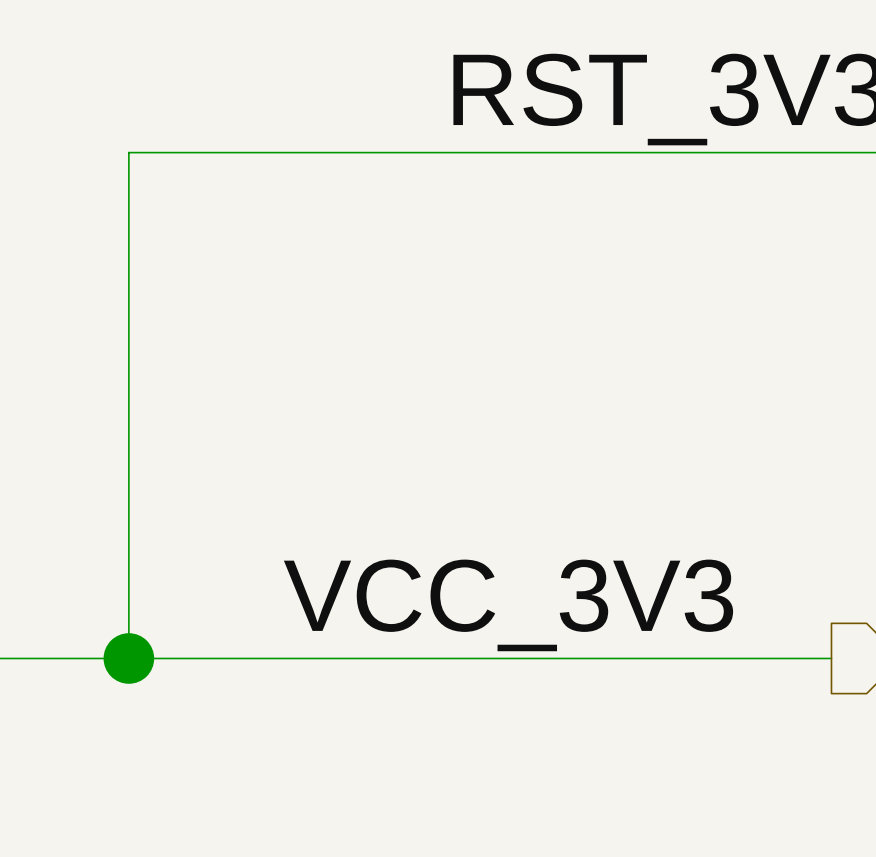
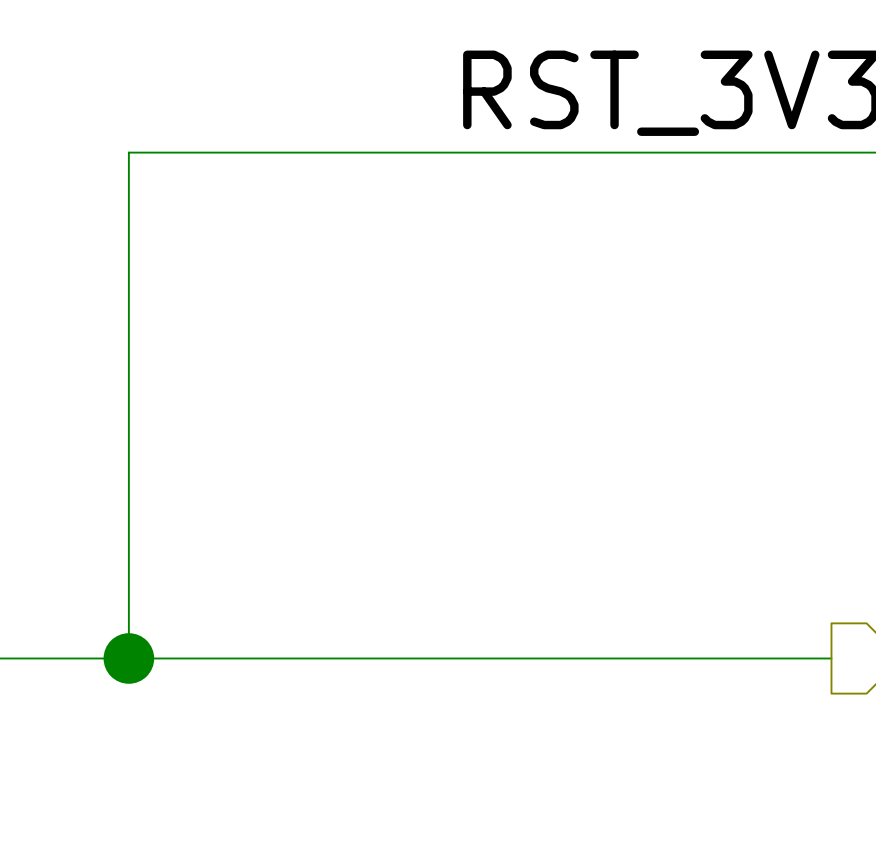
label: VCC_3V3 (508, 605) -> none

